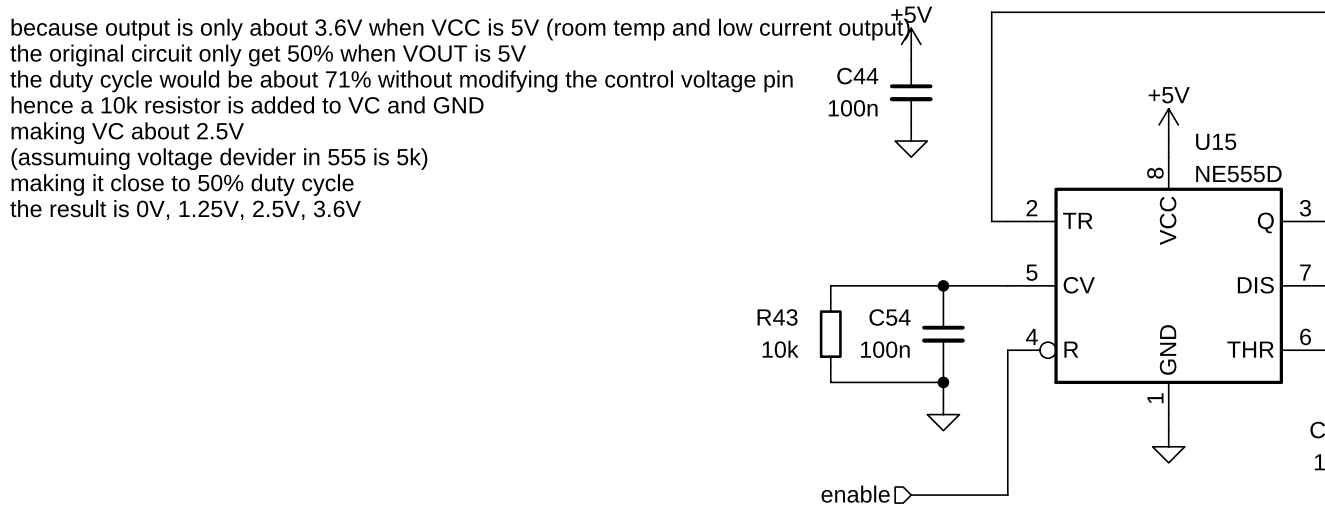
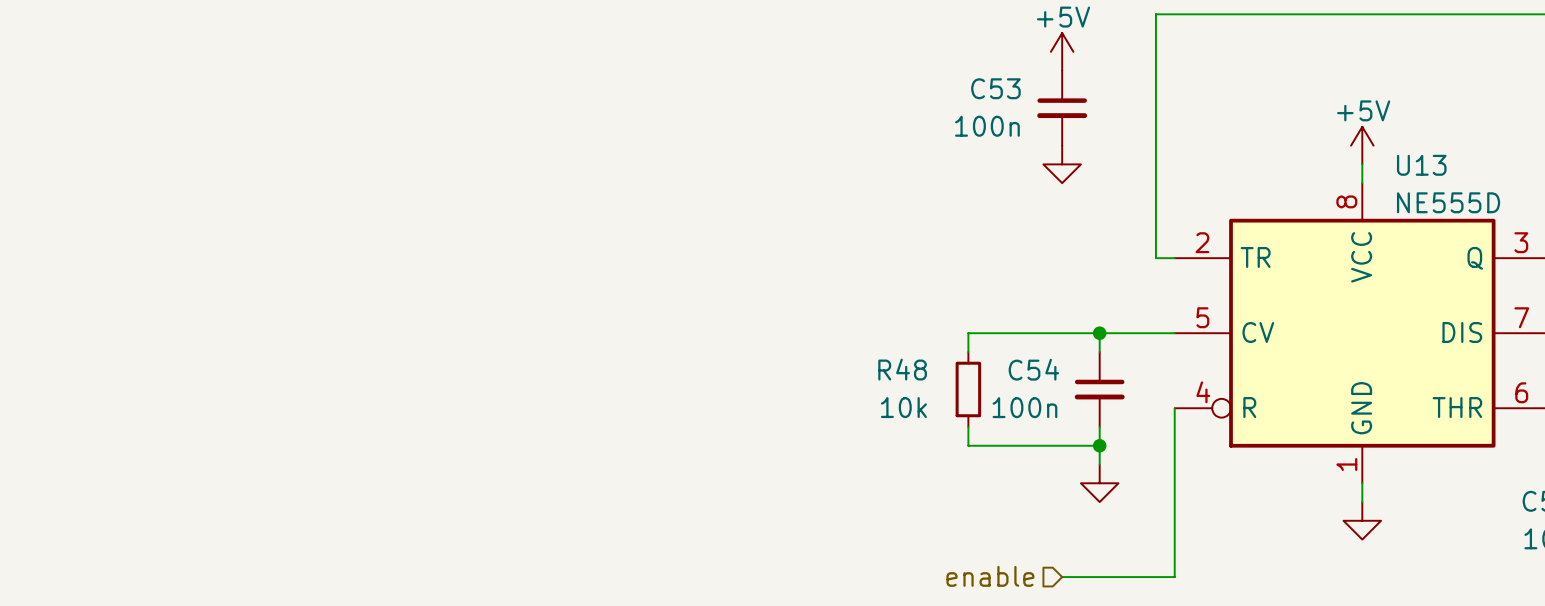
text: because output is only about 3.6V when VCC is 5V (room temp and low current output) (460, 29) -> none
text: the original circuit only get 50% when VOUT is 5V (268, 55) -> none
C44 name: C44 (857, 76) -> C53 (995, 88)
text: the duty cycle would be about 71% without modifying the control voltage pin (401, 81) -> none
text: hence a 10k resistor is added to VC and GND (247, 104) -> none
text: making VC about 2.5V (127, 133) -> none
U15 name: U15 (1216, 141) -> U13 (1421, 165)
text: (assumuing voltage devider in 555 is 5k) (219, 159) -> none
text: making it close to 50% duty cycle (182, 185) -> none
text: the result is 0V, 1.25V, 2.5V, 3.6V (185, 210) -> none
R43 name: R43 (777, 317) -> R48 (902, 369)

